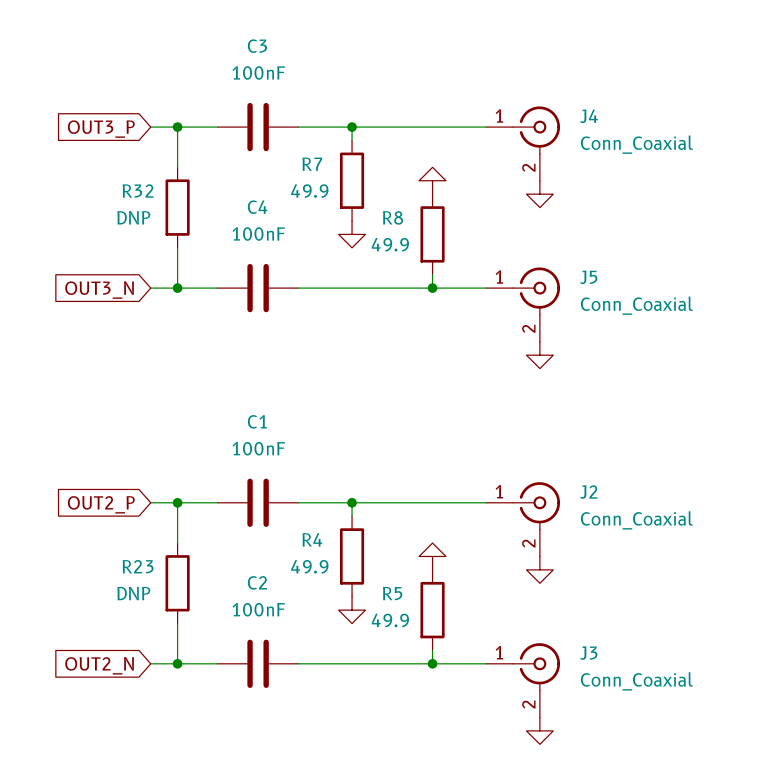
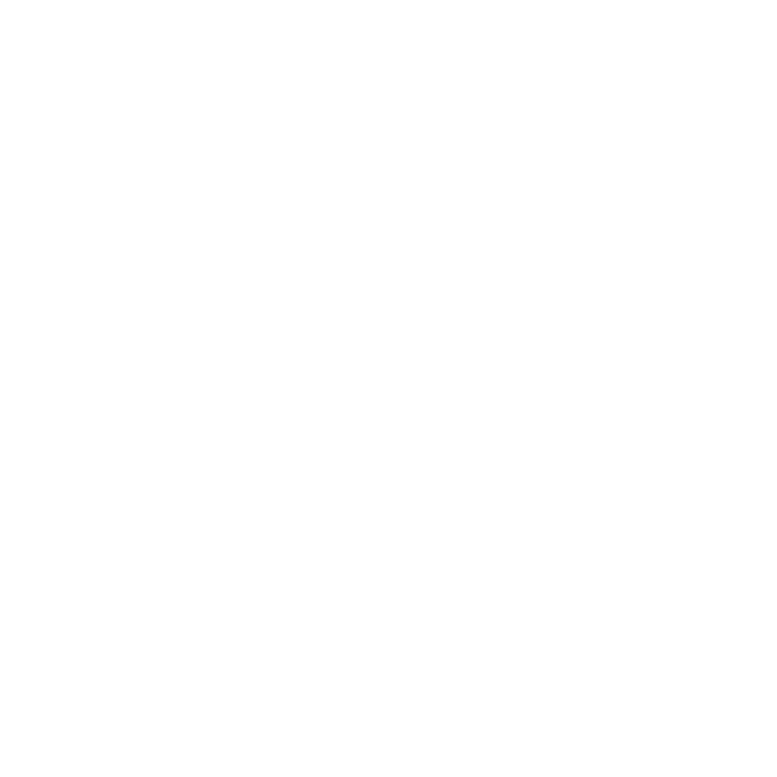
wire: (150, 127) (217, 127) -> none
wire: (177, 127) (177, 167) -> none
junction: (177, 127) -> none
C3: 100nF (258, 127) -> none
wire: (298, 127) (486, 127) -> none
wire: (352, 127) (352, 140) -> none
junction: (352, 127) -> none
global label: OUT3_P (101, 129) -> none
J4: Conn_Coaxial (523, 143) -> none
R7: 49.9 (352, 180) -> none
power symbol: (432, 180) -> none
power symbol: (539, 194) -> none
R32: DNP (177, 207) -> none
power symbol: (352, 234) -> none
R8: 49.9 (432, 234) -> none
wire: (177, 247) (177, 288) -> none
wire: (432, 274) (432, 288) -> none
wire: (150, 288) (217, 288) -> none
junction: (177, 288) -> none
C4: 100nF (258, 288) -> none
wire: (298, 288) (486, 288) -> none
junction: (432, 288) -> none
global label: OUT3_N (99, 290) -> none
J5: Conn_Coaxial (523, 304) -> none
power symbol: (539, 355) -> none
wire: (150, 502) (217, 502) -> none
wire: (177, 502) (177, 543) -> none
junction: (177, 502) -> none
C1: 100nF (258, 502) -> none
wire: (298, 502) (486, 502) -> none
wire: (352, 502) (352, 516) -> none
junction: (352, 502) -> none
global label: OUT2_P (101, 504) -> none
J2: Conn_Coaxial (523, 519) -> none
R4: 49.9 (352, 556) -> none
power symbol: (432, 556) -> none
power symbol: (539, 569) -> none
R23: DNP (177, 583) -> none
power symbol: (352, 610) -> none
R5: 49.9 (432, 610) -> none
wire: (177, 623) (177, 663) -> none
wire: (432, 650) (432, 663) -> none
wire: (150, 663) (217, 663) -> none
junction: (177, 663) -> none
C2: 100nF (258, 663) -> none
wire: (298, 663) (486, 663) -> none
junction: (432, 663) -> none
global label: OUT2_N (99, 665) -> none
J3: Conn_Coaxial (523, 680) -> none
power symbol: (539, 730) -> none

